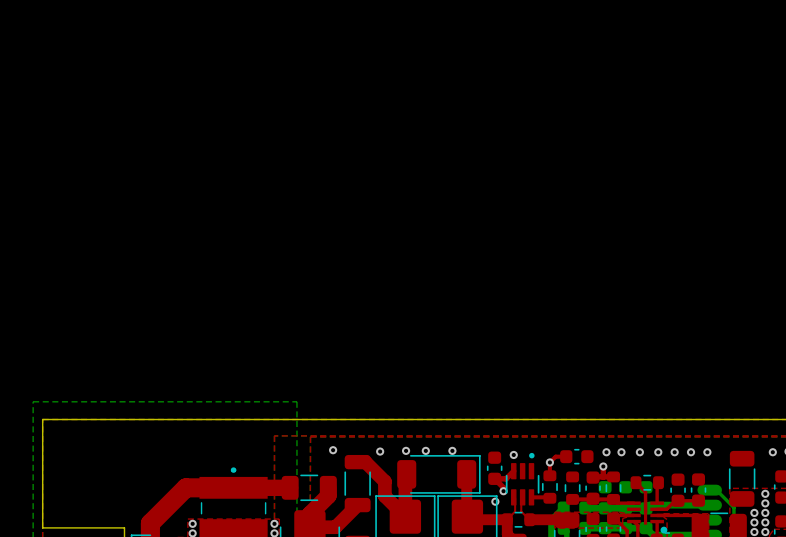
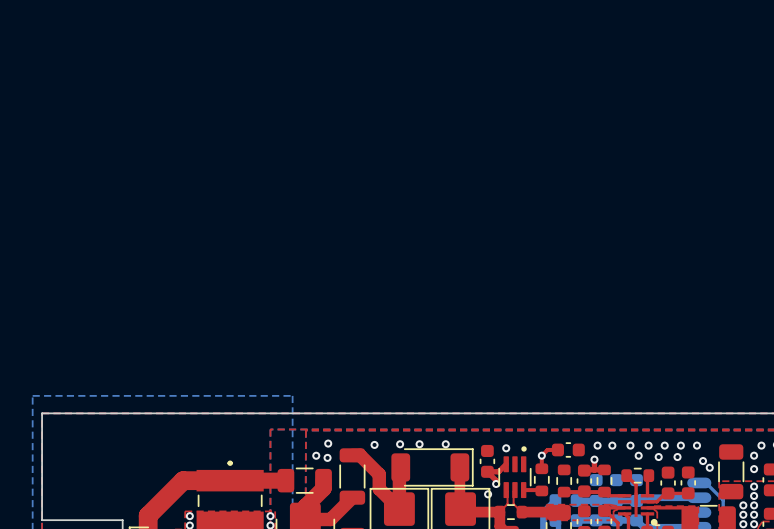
via: none -> (316, 455)
via: none -> (638, 455)
via: none -> (754, 455)
via: none -> (658, 457)
via: none -> (677, 457)
via: none -> (327, 457)
via: none -> (703, 461)
via: none -> (709, 467)
via: none -> (754, 469)

